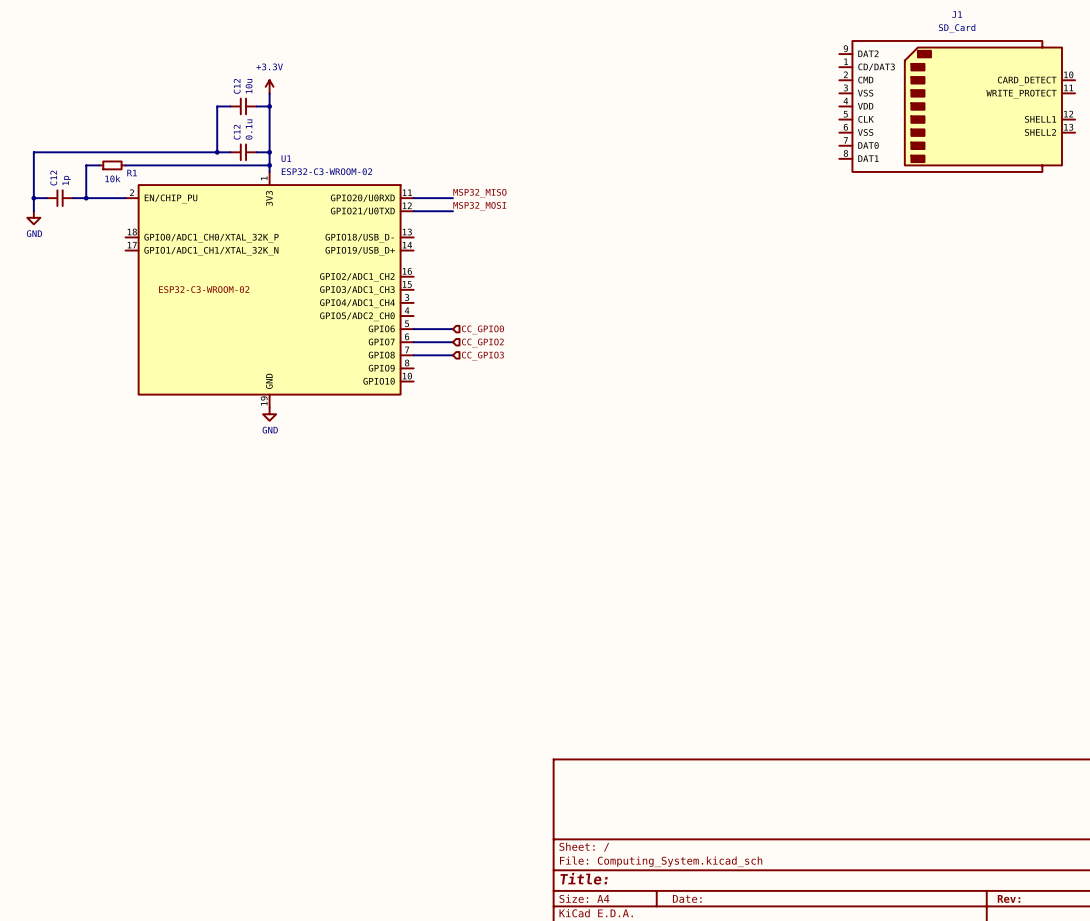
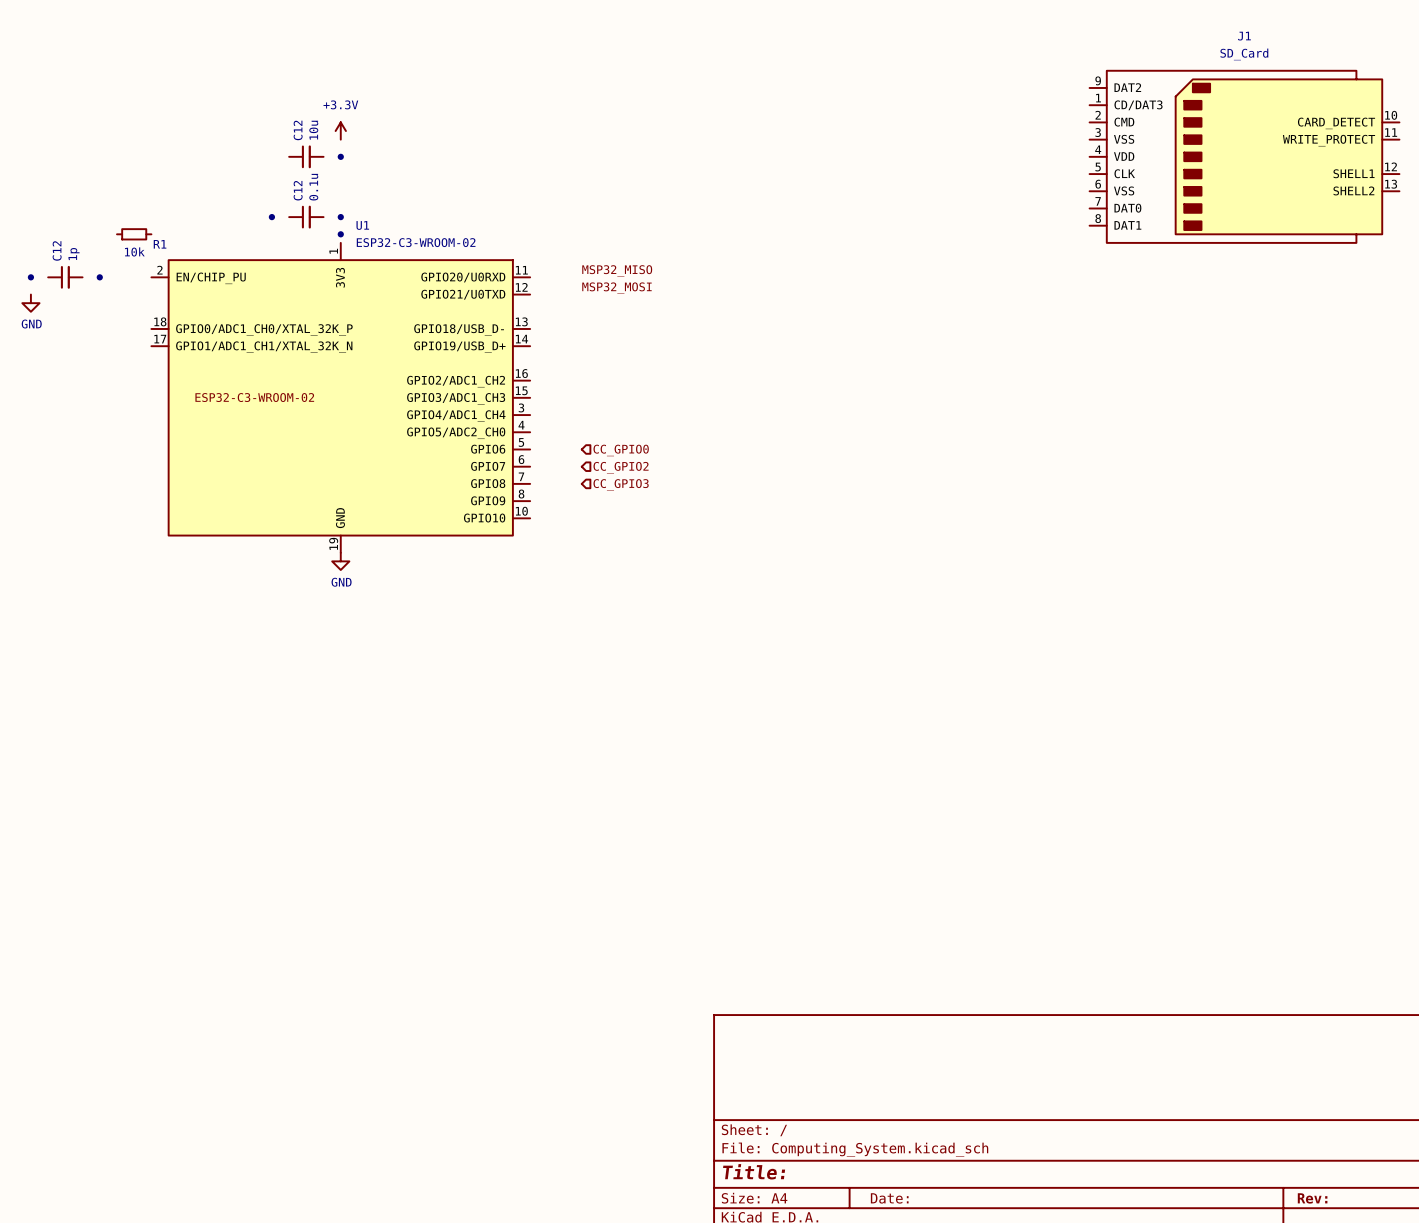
wire: (269, 93) (269, 171) -> none
wire: (230, 106) (217, 106) (217, 152) -> none
wire: (256, 106) (269, 106) -> none
wire: (230, 152) (33, 152) (33, 211) -> none
wire: (256, 152) (269, 152) -> none
wire: (99, 165) (86, 165) (86, 198) -> none
wire: (125, 165) (269, 165) -> none
wire: (33, 198) (46, 198) -> none
wire: (73, 198) (125, 198) -> none
wire: (413, 198) (452, 198) -> none
wire: (413, 211) (452, 211) -> none
wire: (413, 329) (452, 329) -> none
wire: (413, 342) (452, 342) -> none
wire: (413, 355) (452, 355) -> none

